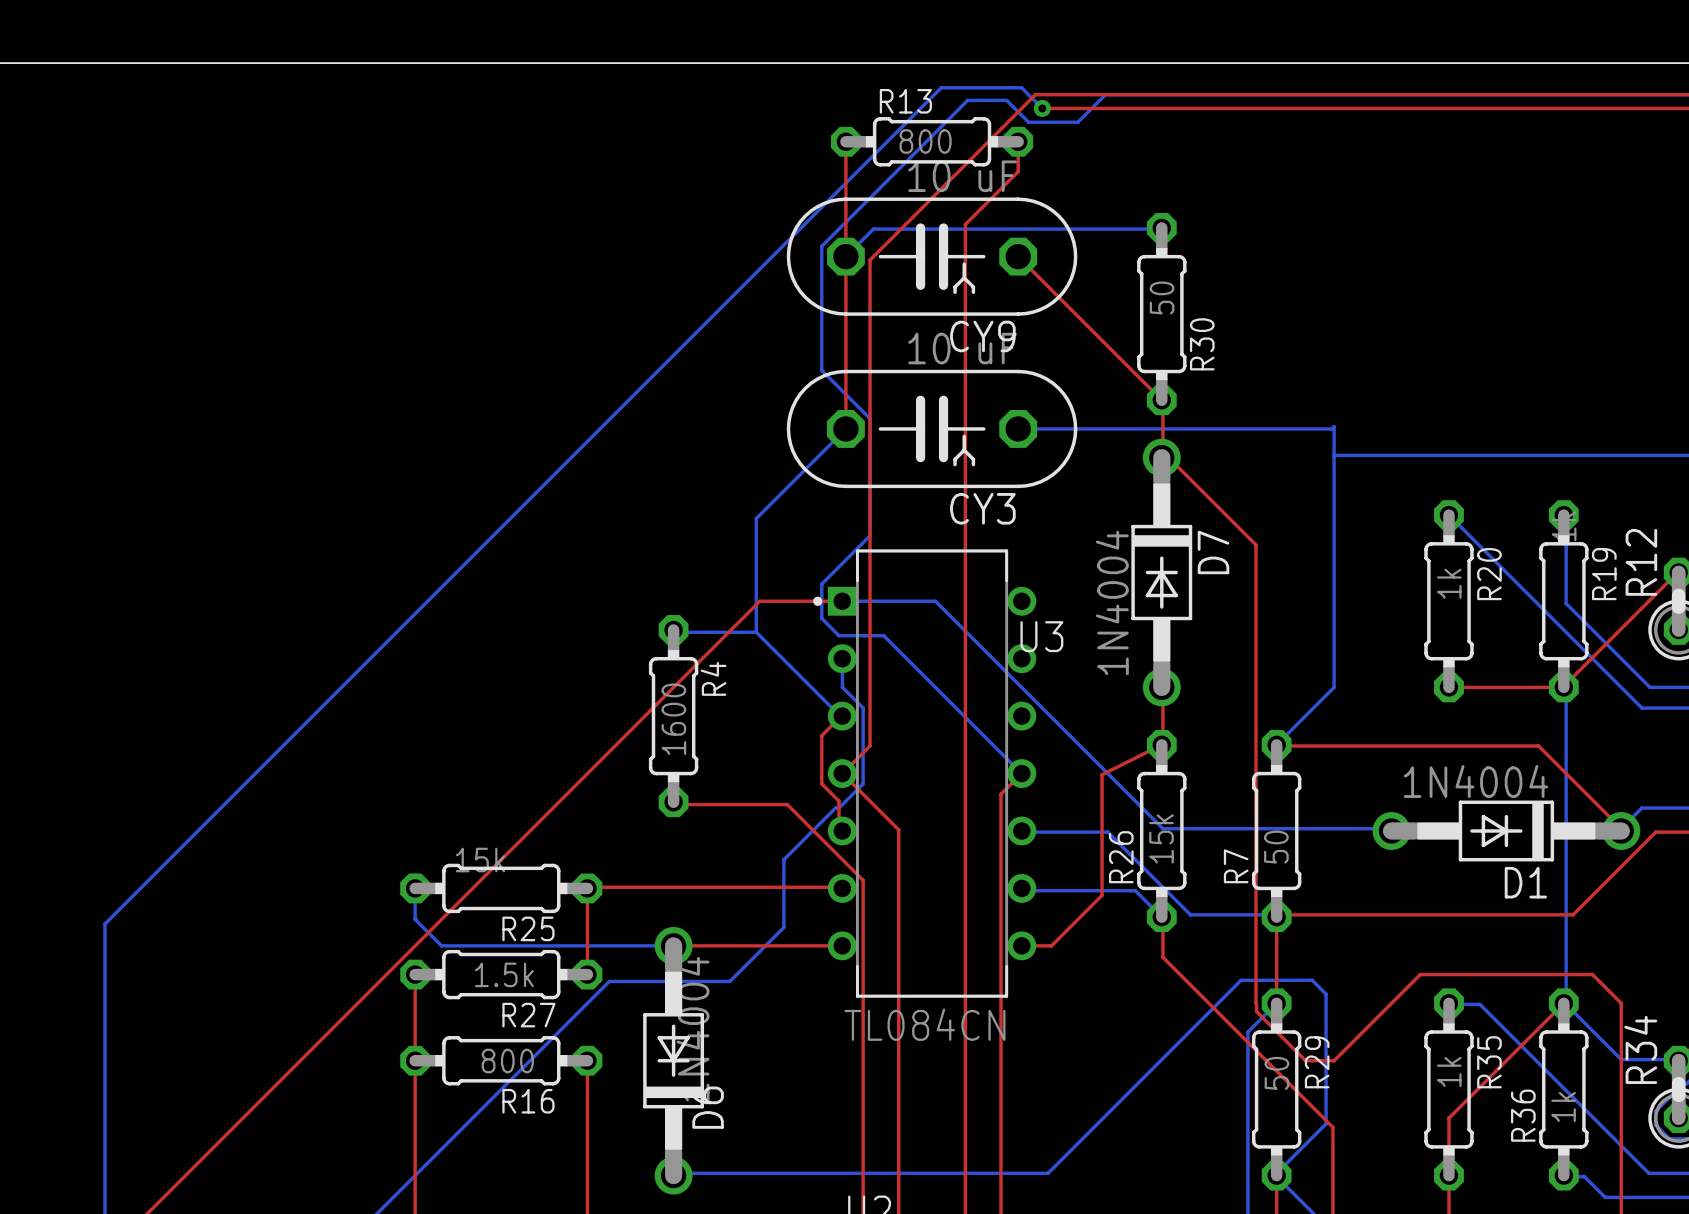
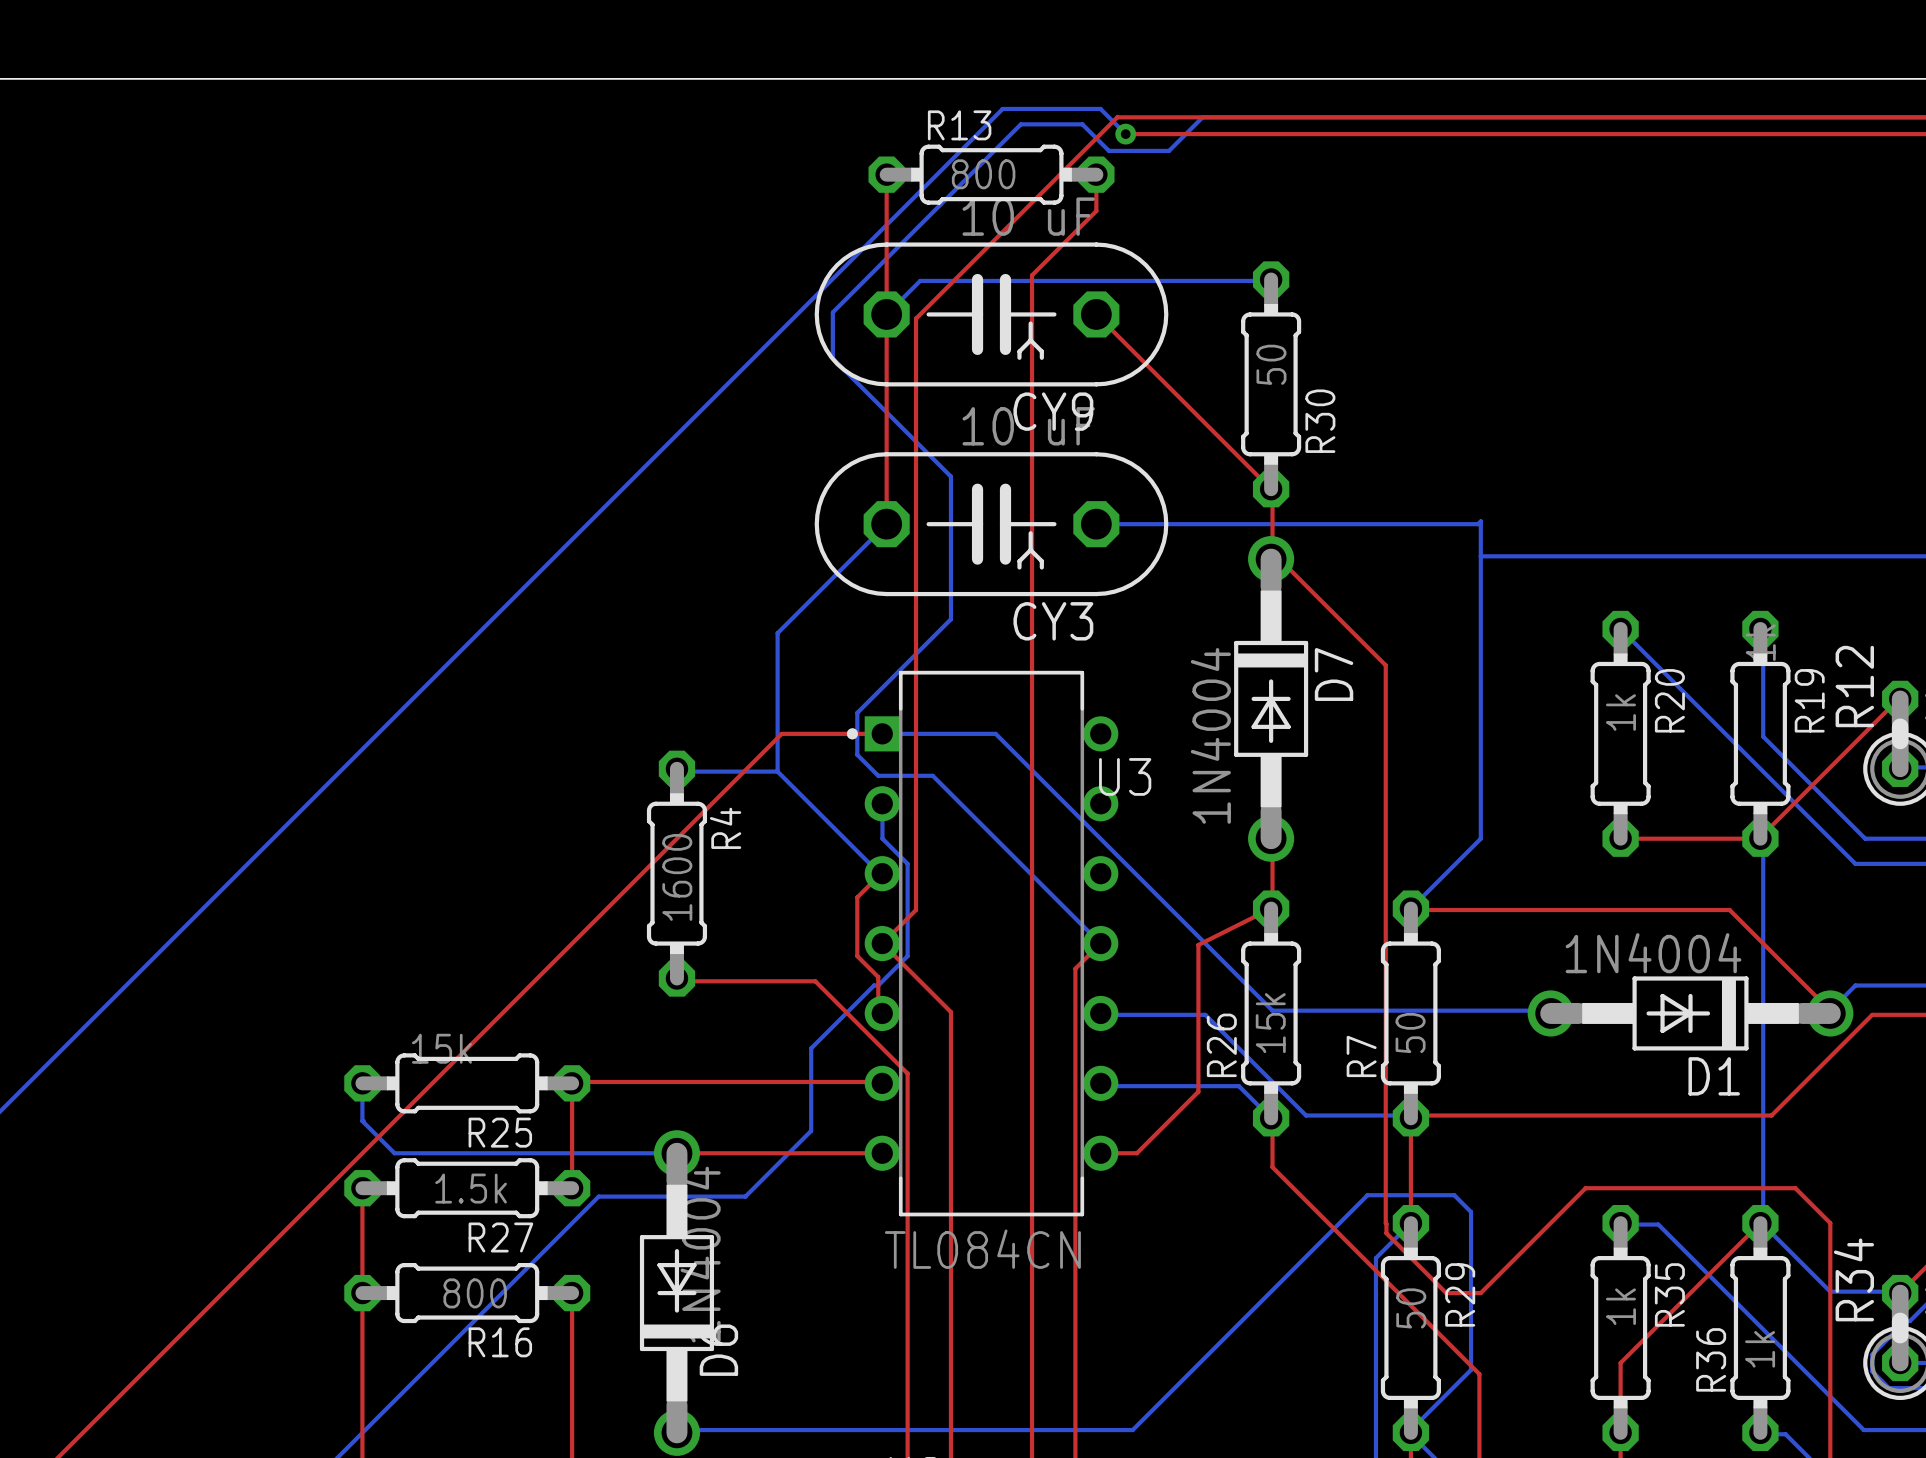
bottom track: (967, 100) (821, 246) (821, 370) (870, 418) (870, 535) -> (1034, 124) (1020, 124) (832, 312) (832, 358) (950, 476) (950, 619) (916, 654)

